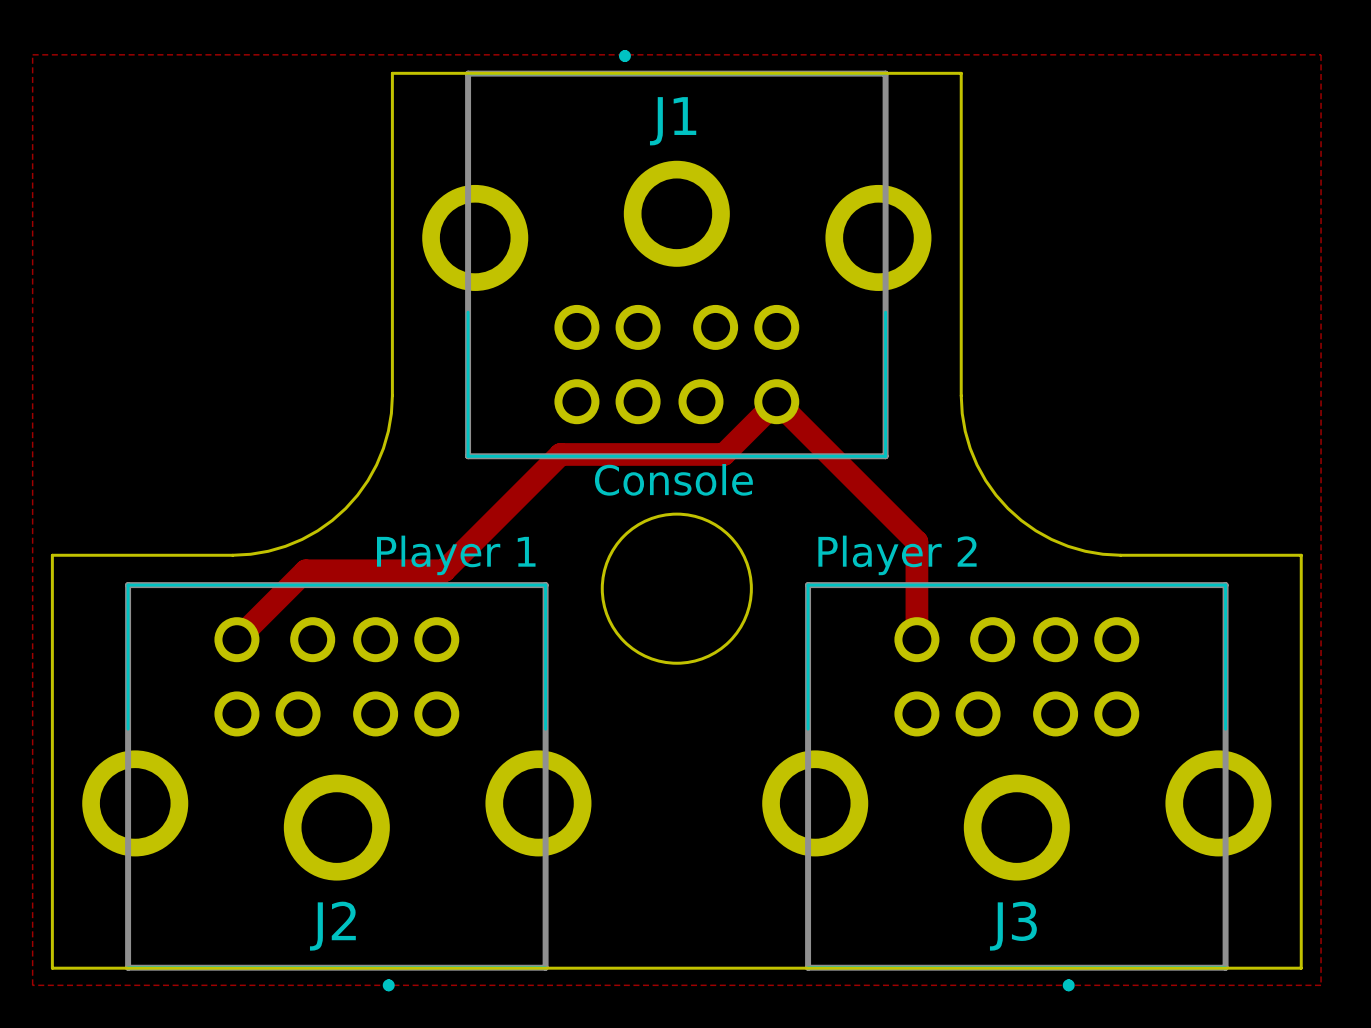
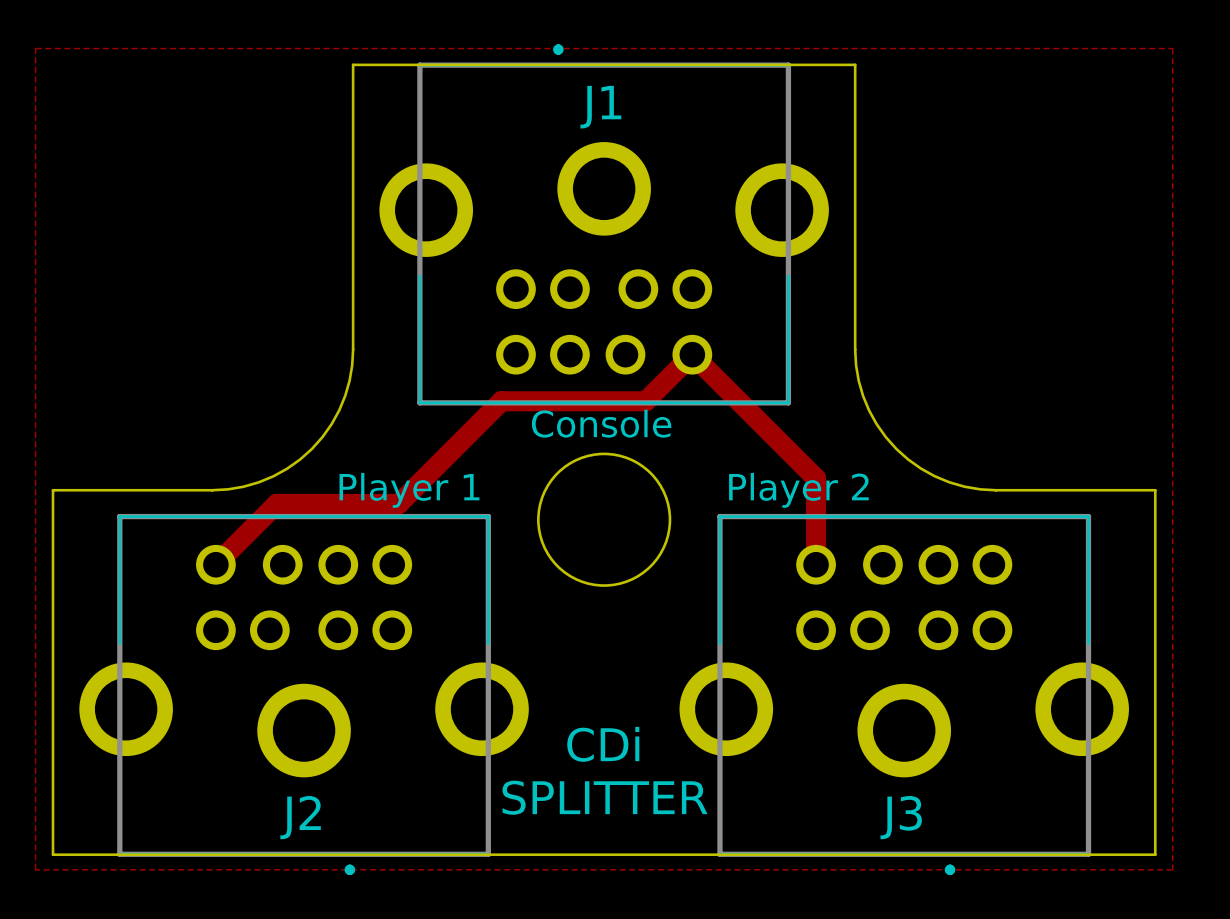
text: none -> CDi (603, 744)
text: none -> SPLITTER (605, 797)

